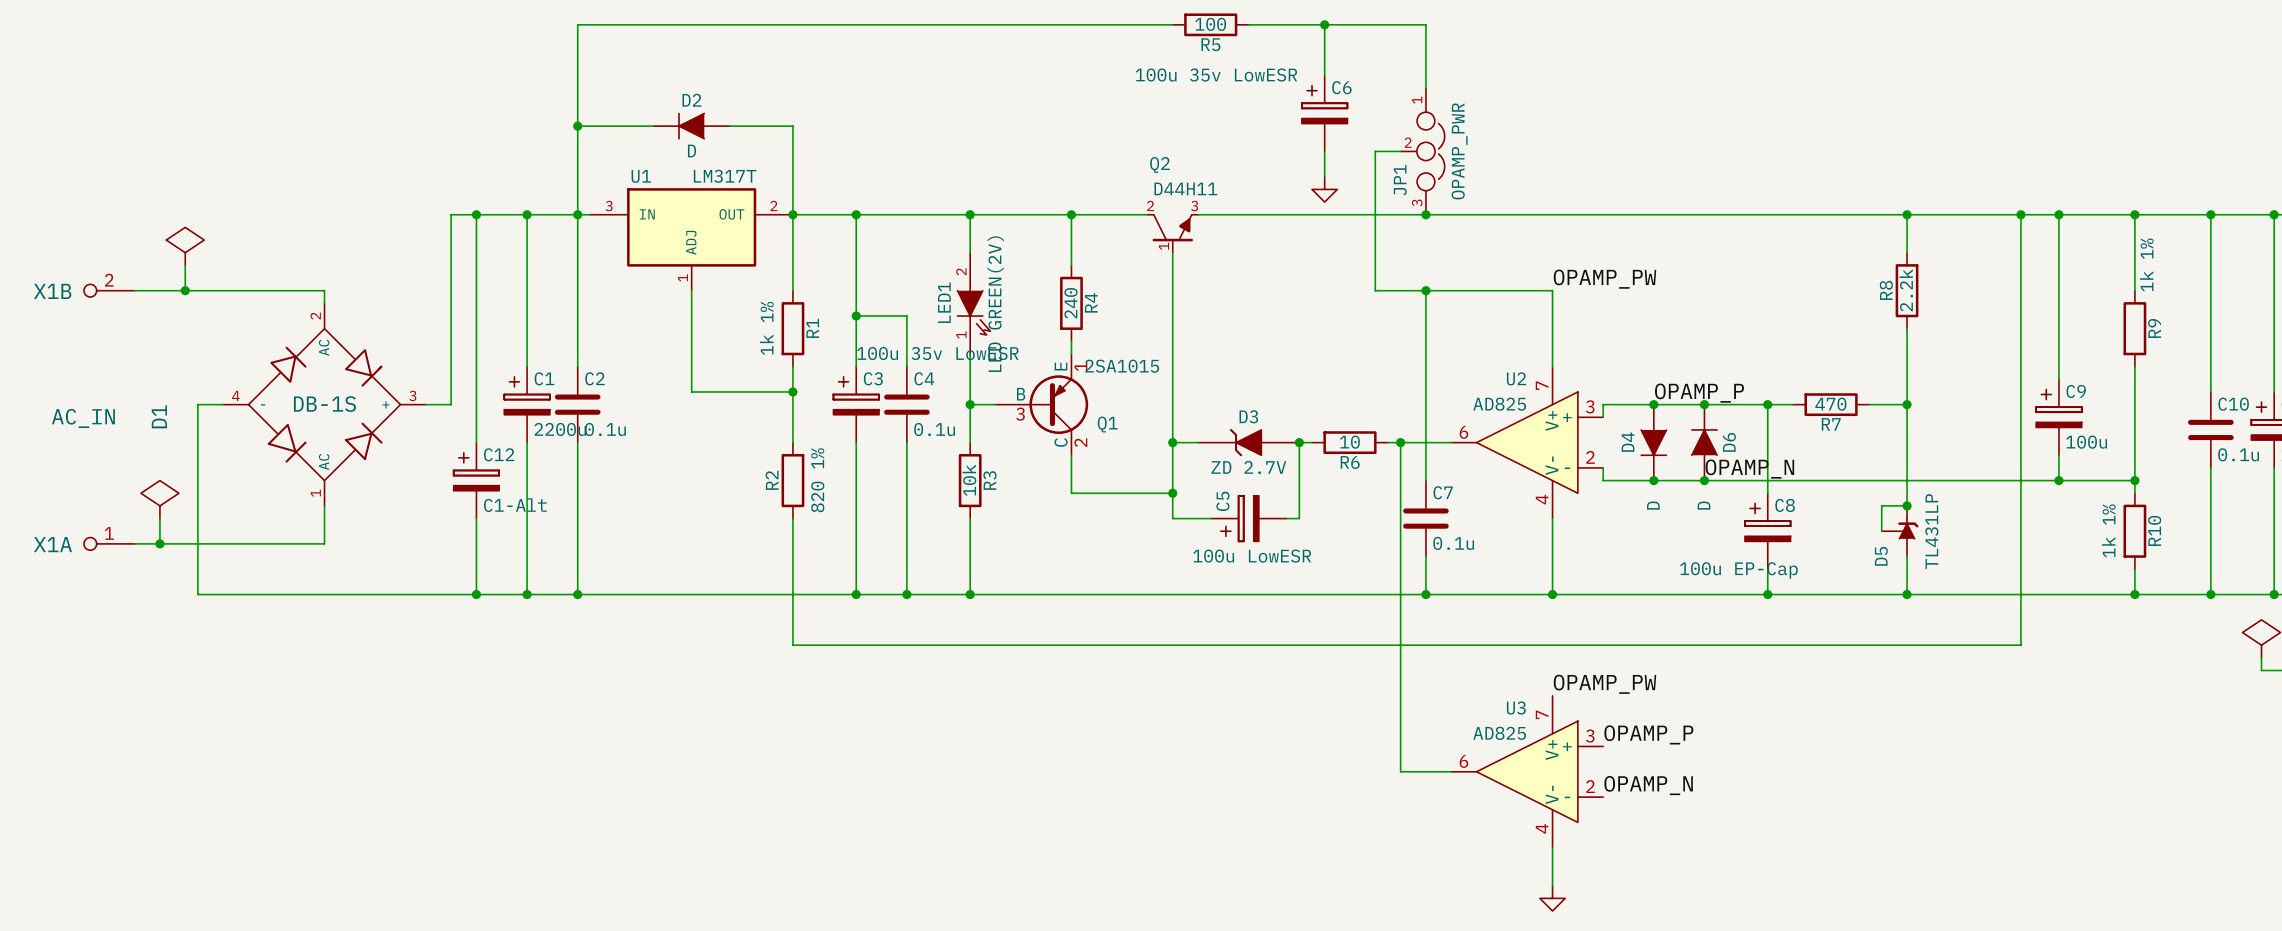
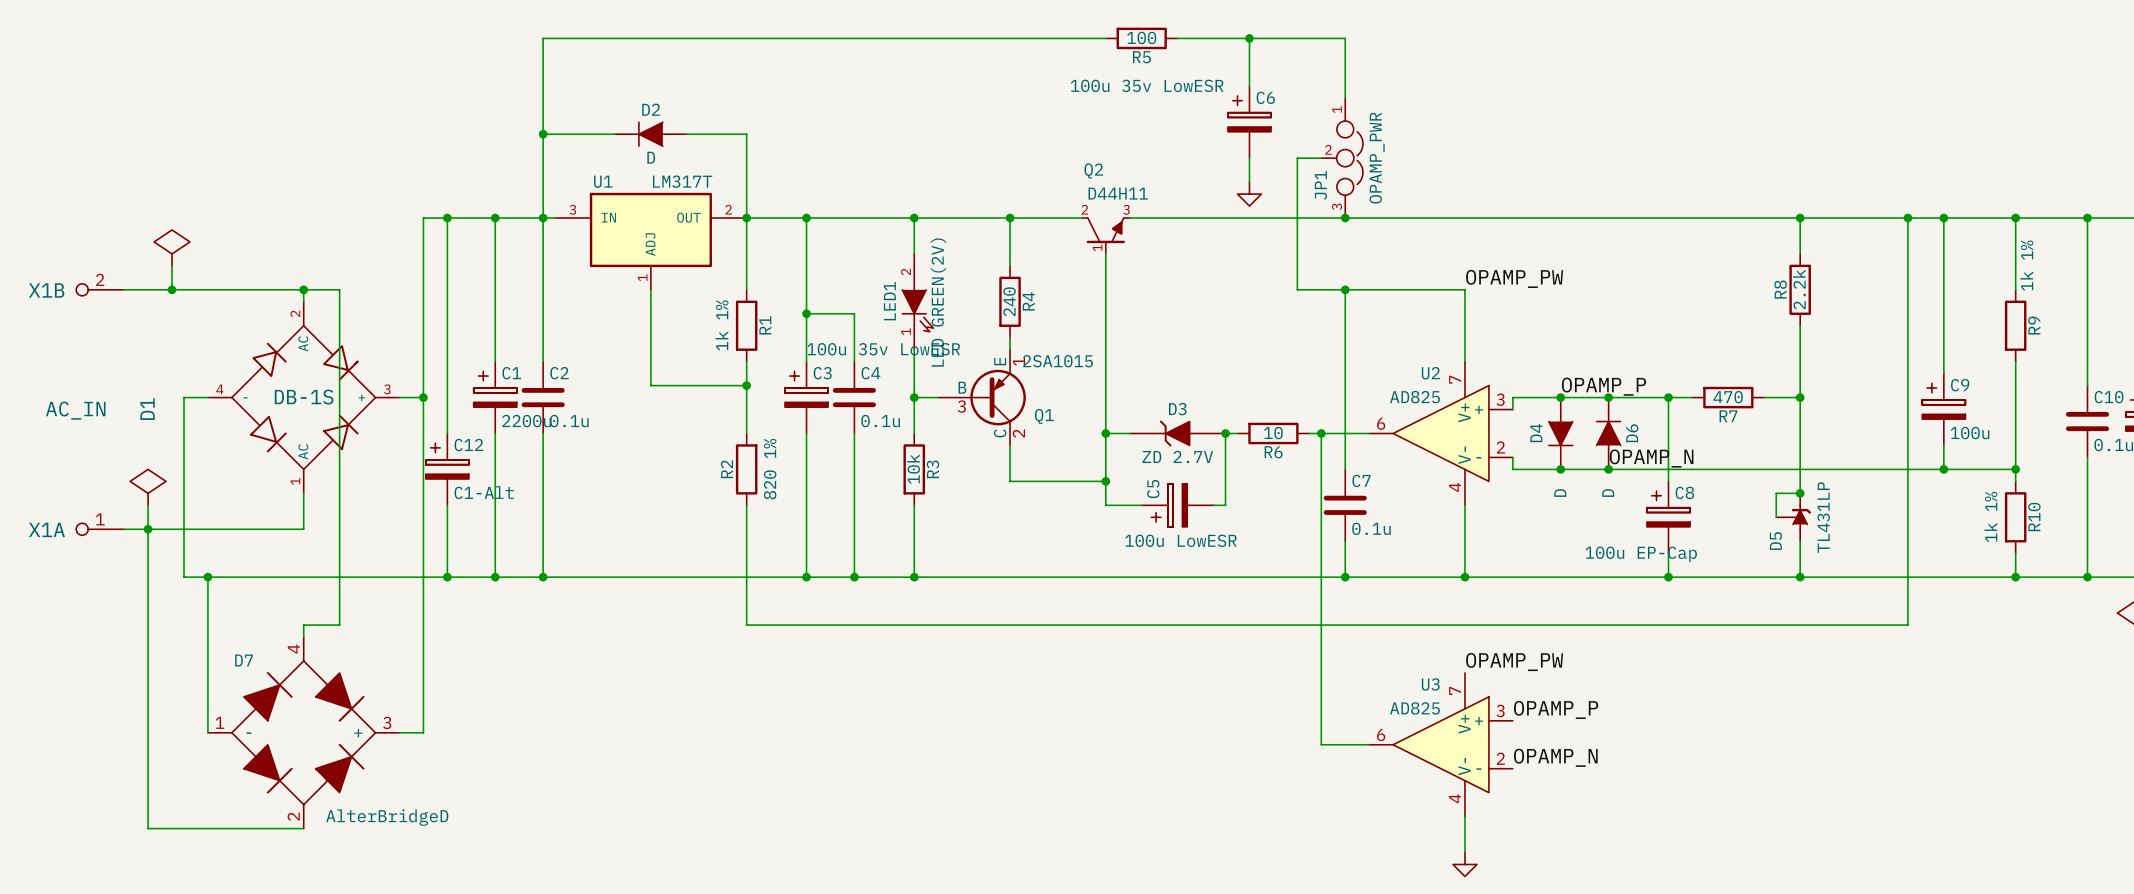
wire: none -> (303, 289) (339, 289) (339, 625) (303, 625) (303, 637)
junction: none -> (303, 289)
wire: none -> (423, 397) (423, 732) (399, 732)
junction: none -> (423, 397)
wire: none -> (148, 529) (148, 828) (303, 828)
wire: none -> (207, 577) (207, 732)
junction: none -> (207, 577)
D7: none -> AlterBridgeD (303, 732)

